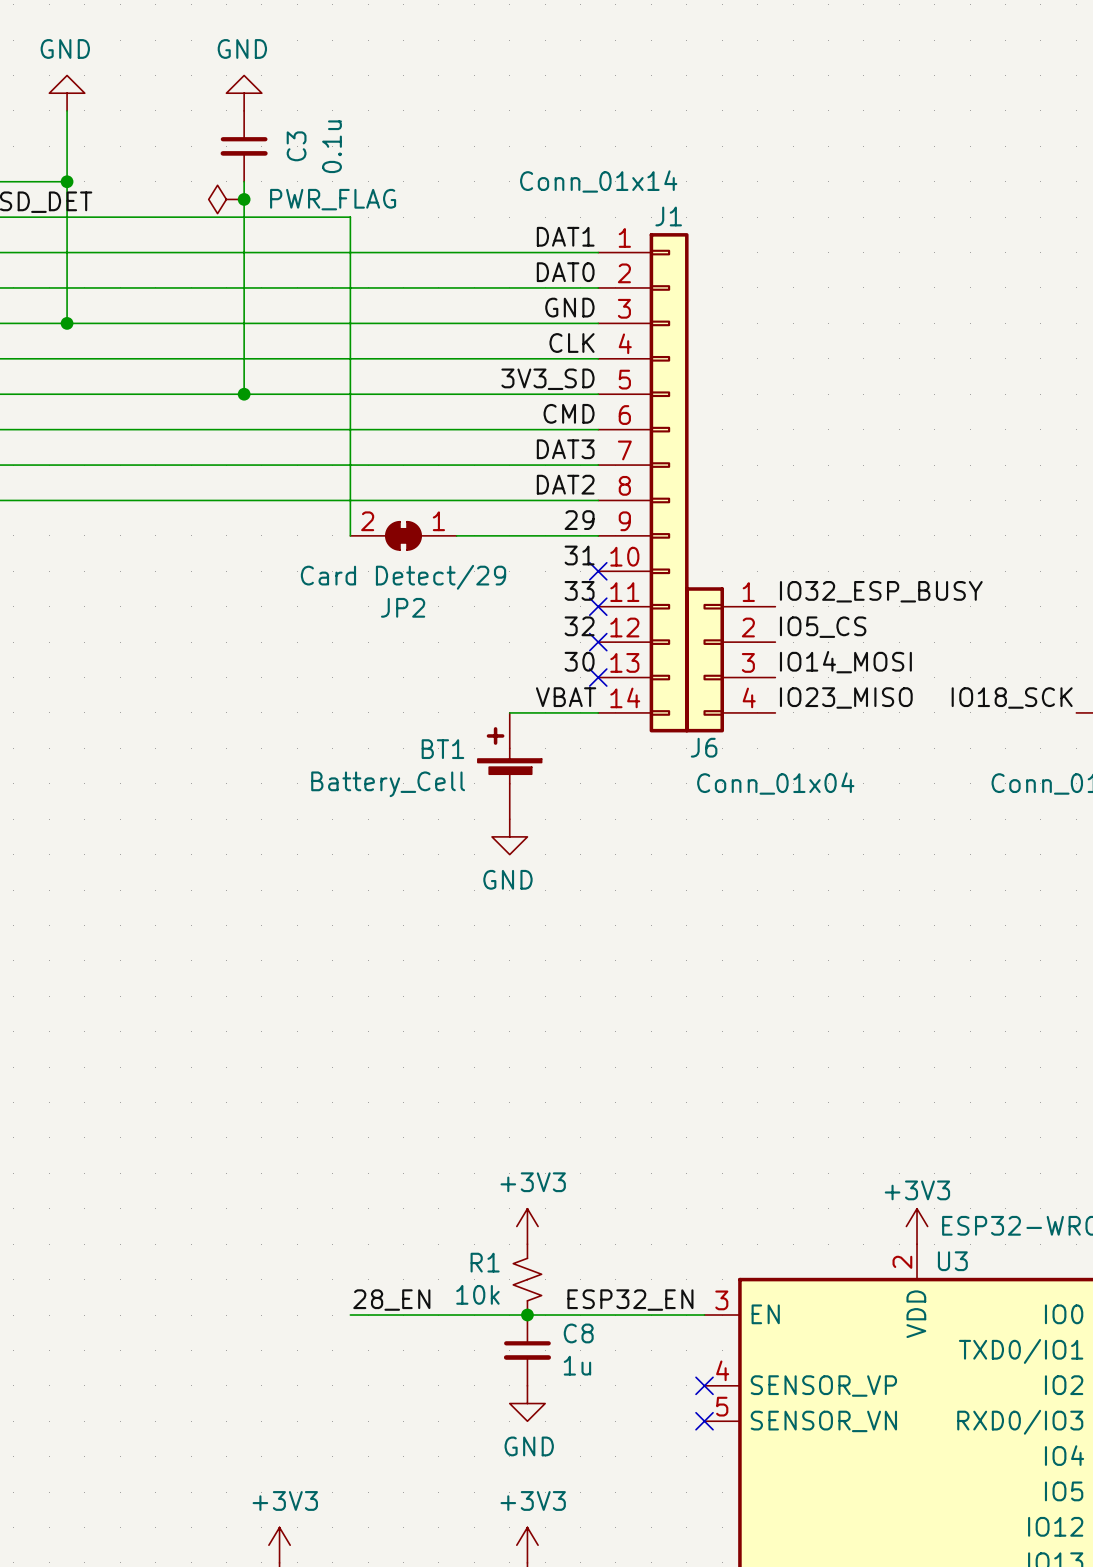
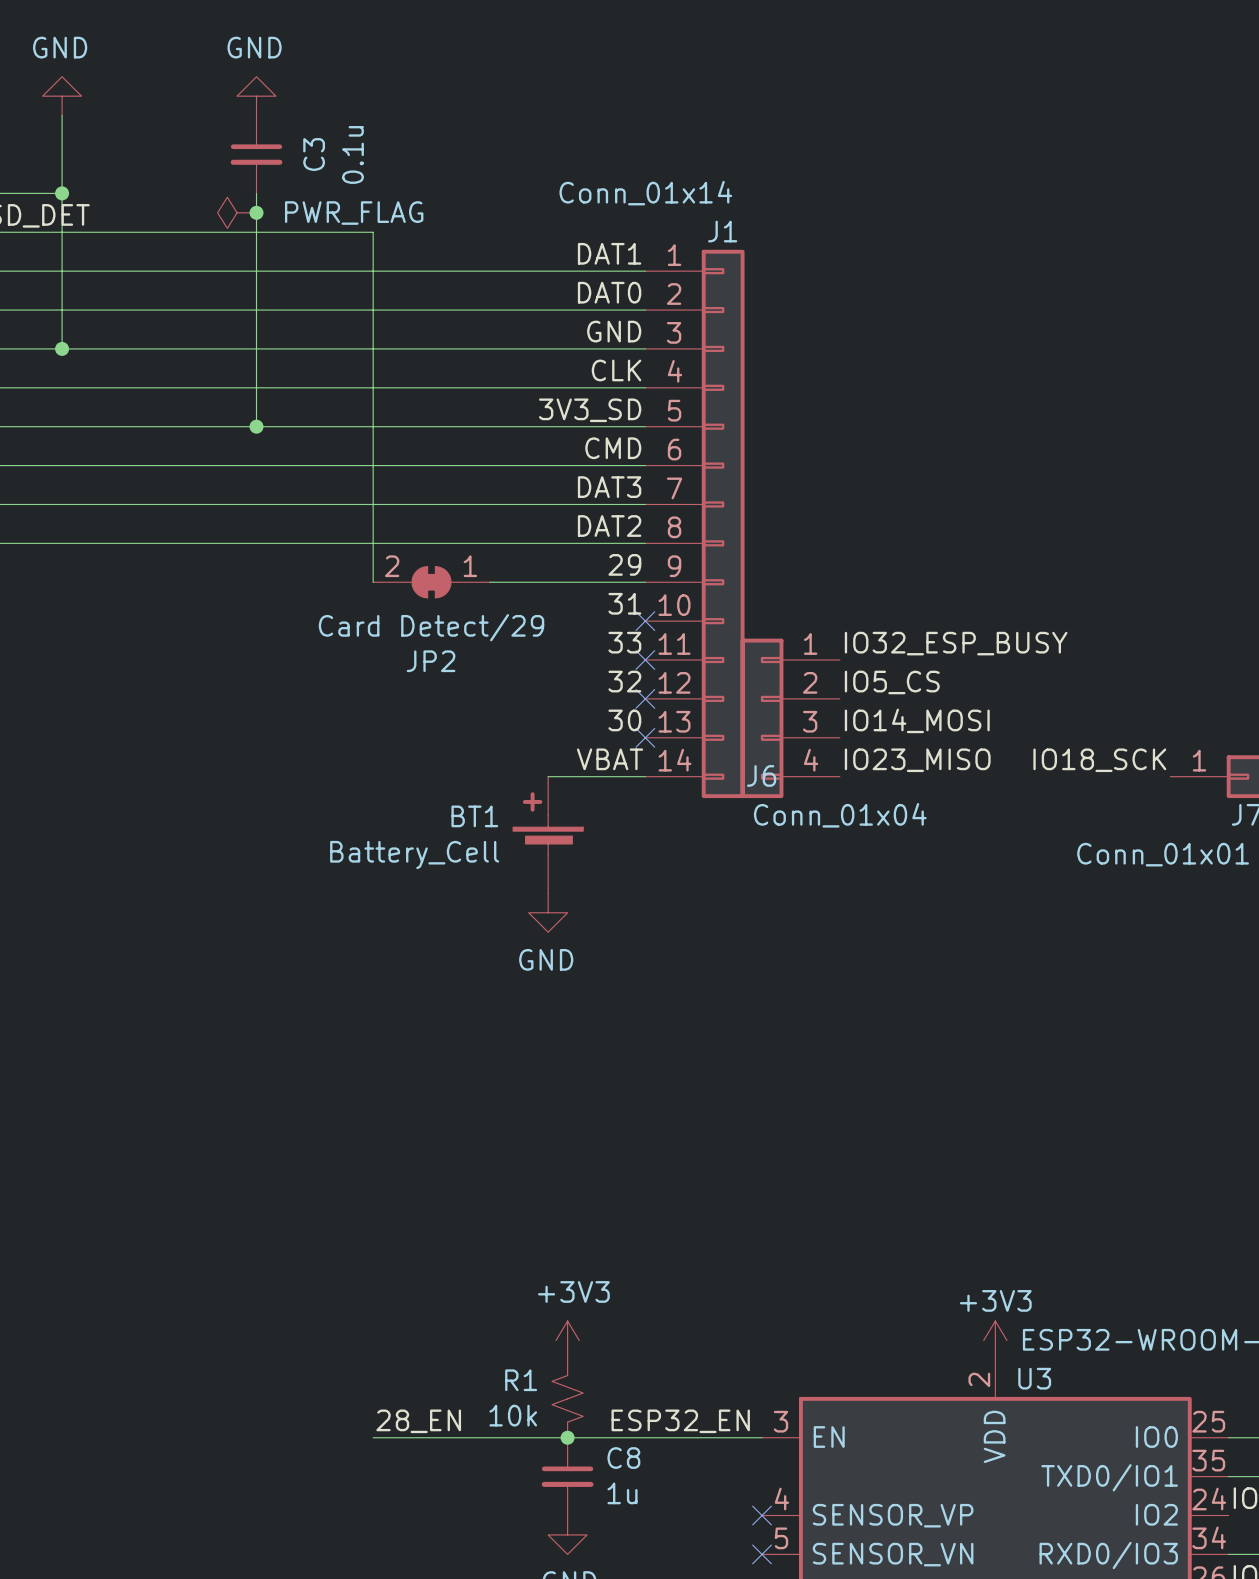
J6 name position: J6 (704, 747) -> J6 (761, 775)
J6 value position: Conn_01x04 (775, 783) -> Conn_01x04 (840, 815)

